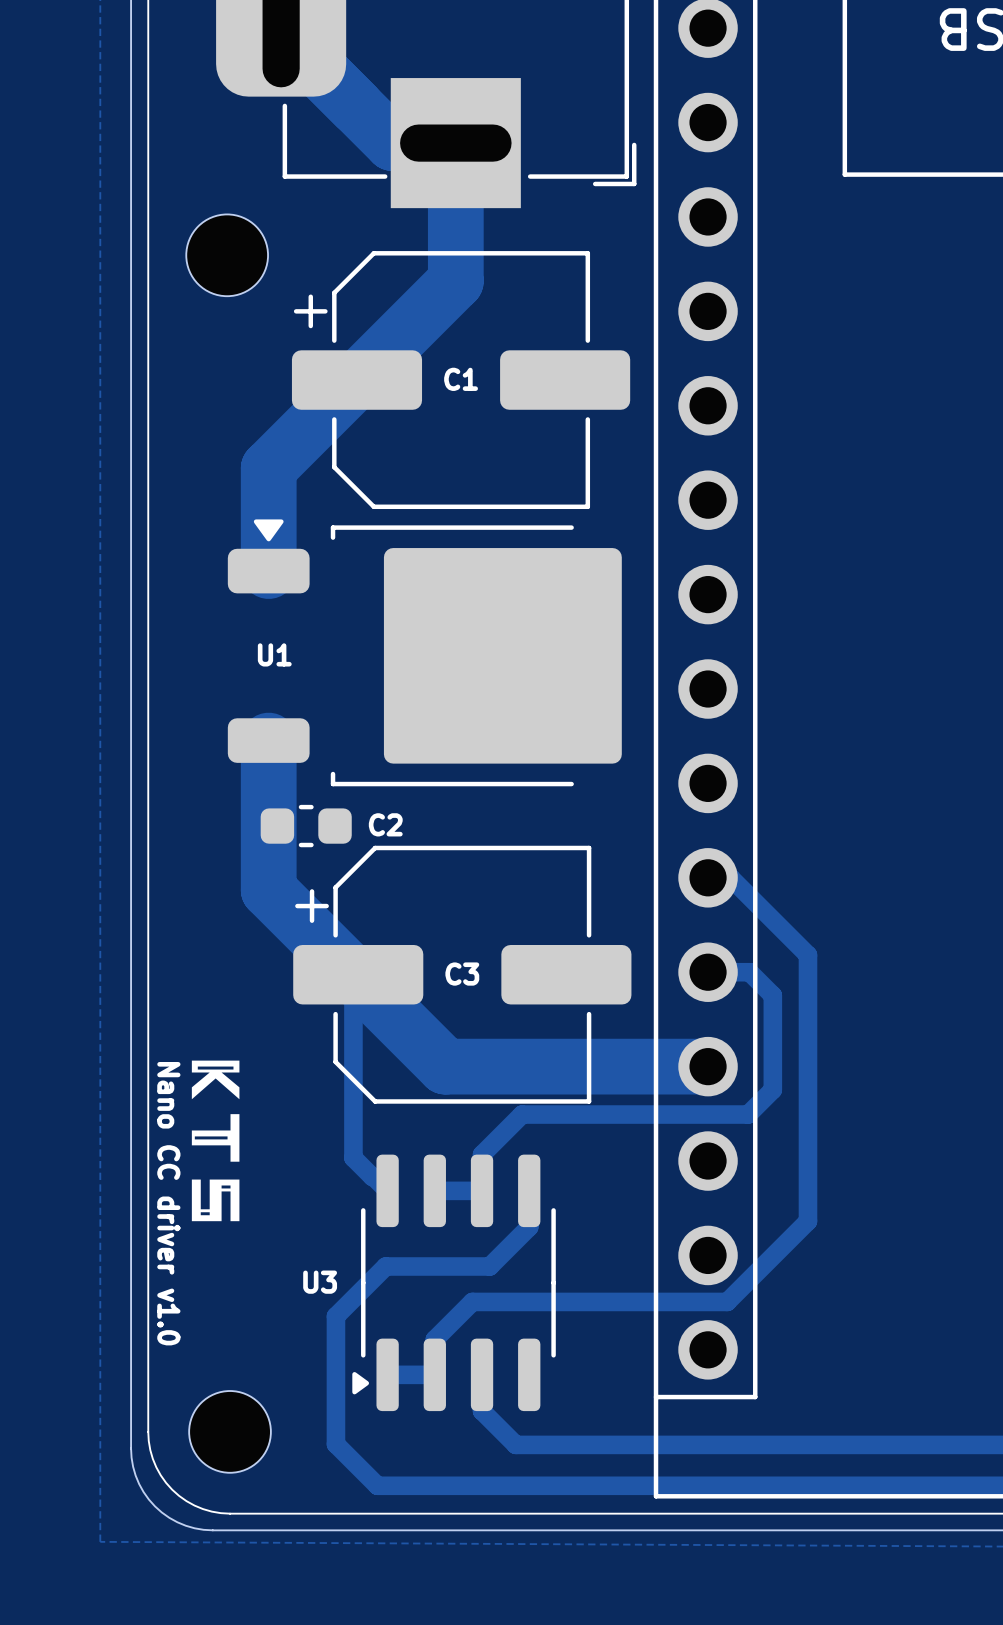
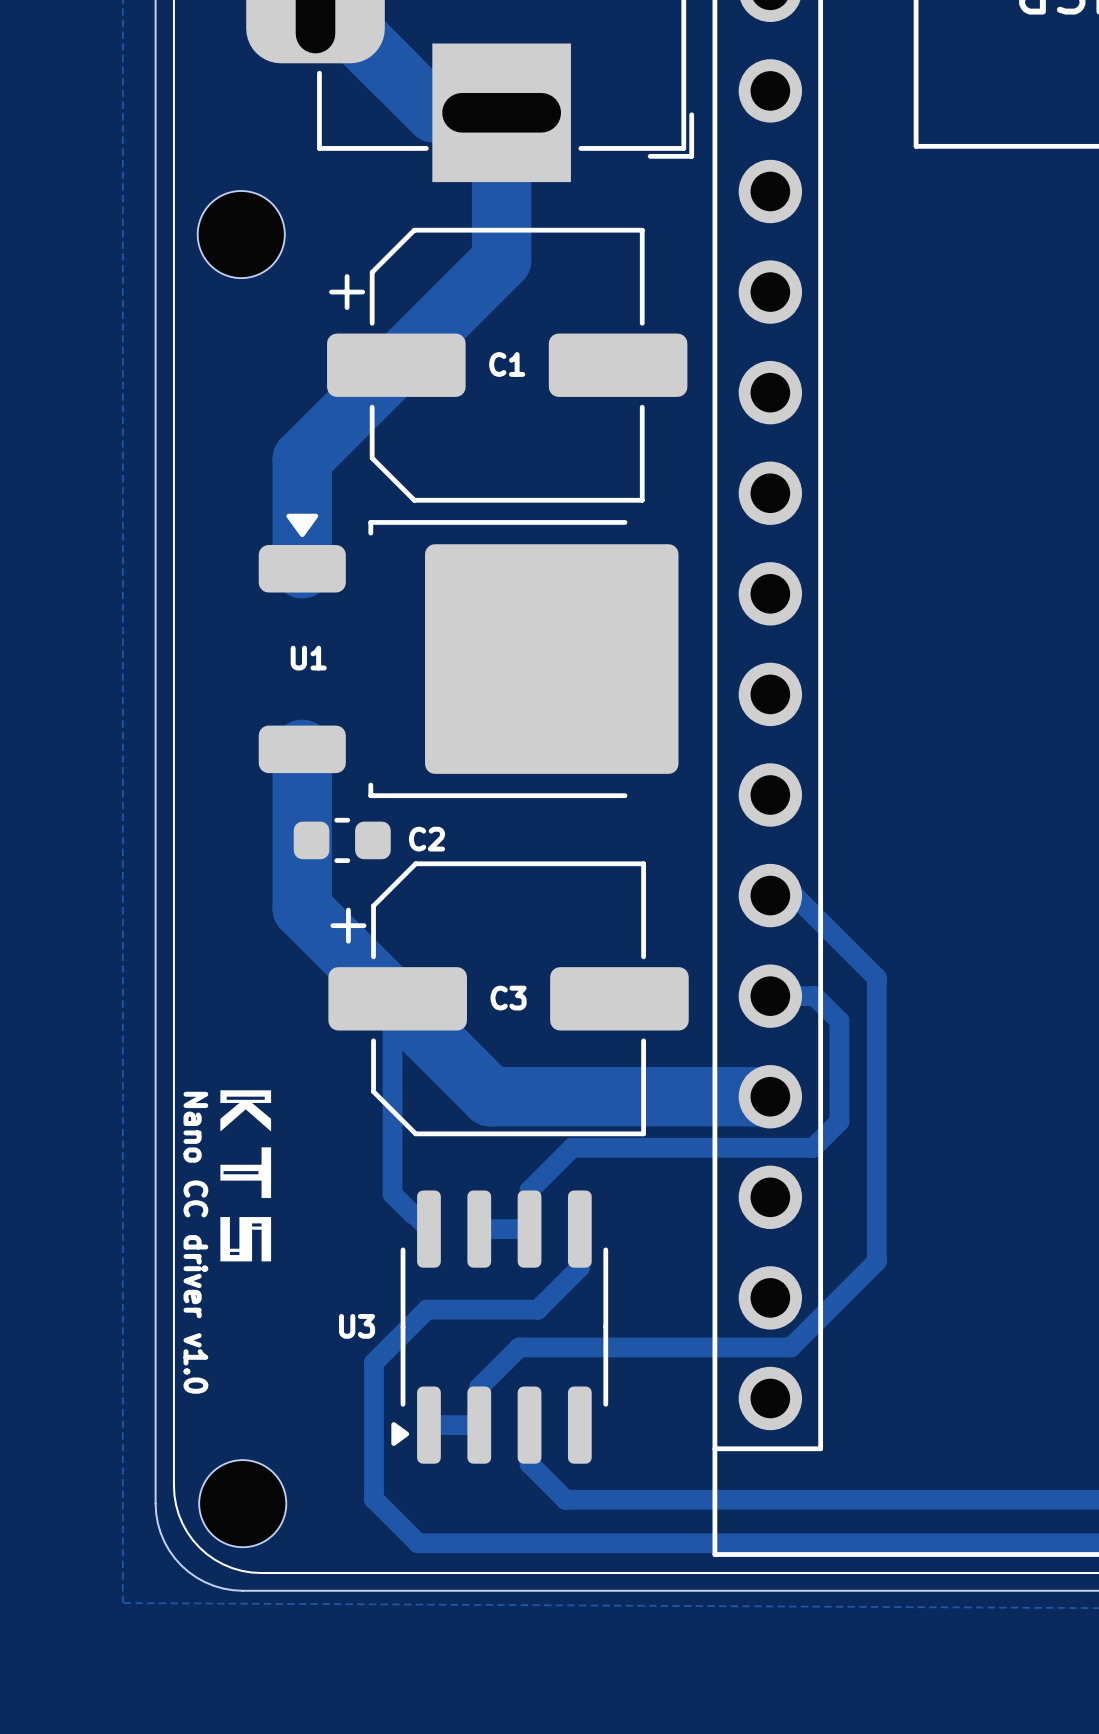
part position: (227, 255) -> (241, 234)
part position: (230, 1431) -> (242, 1503)

